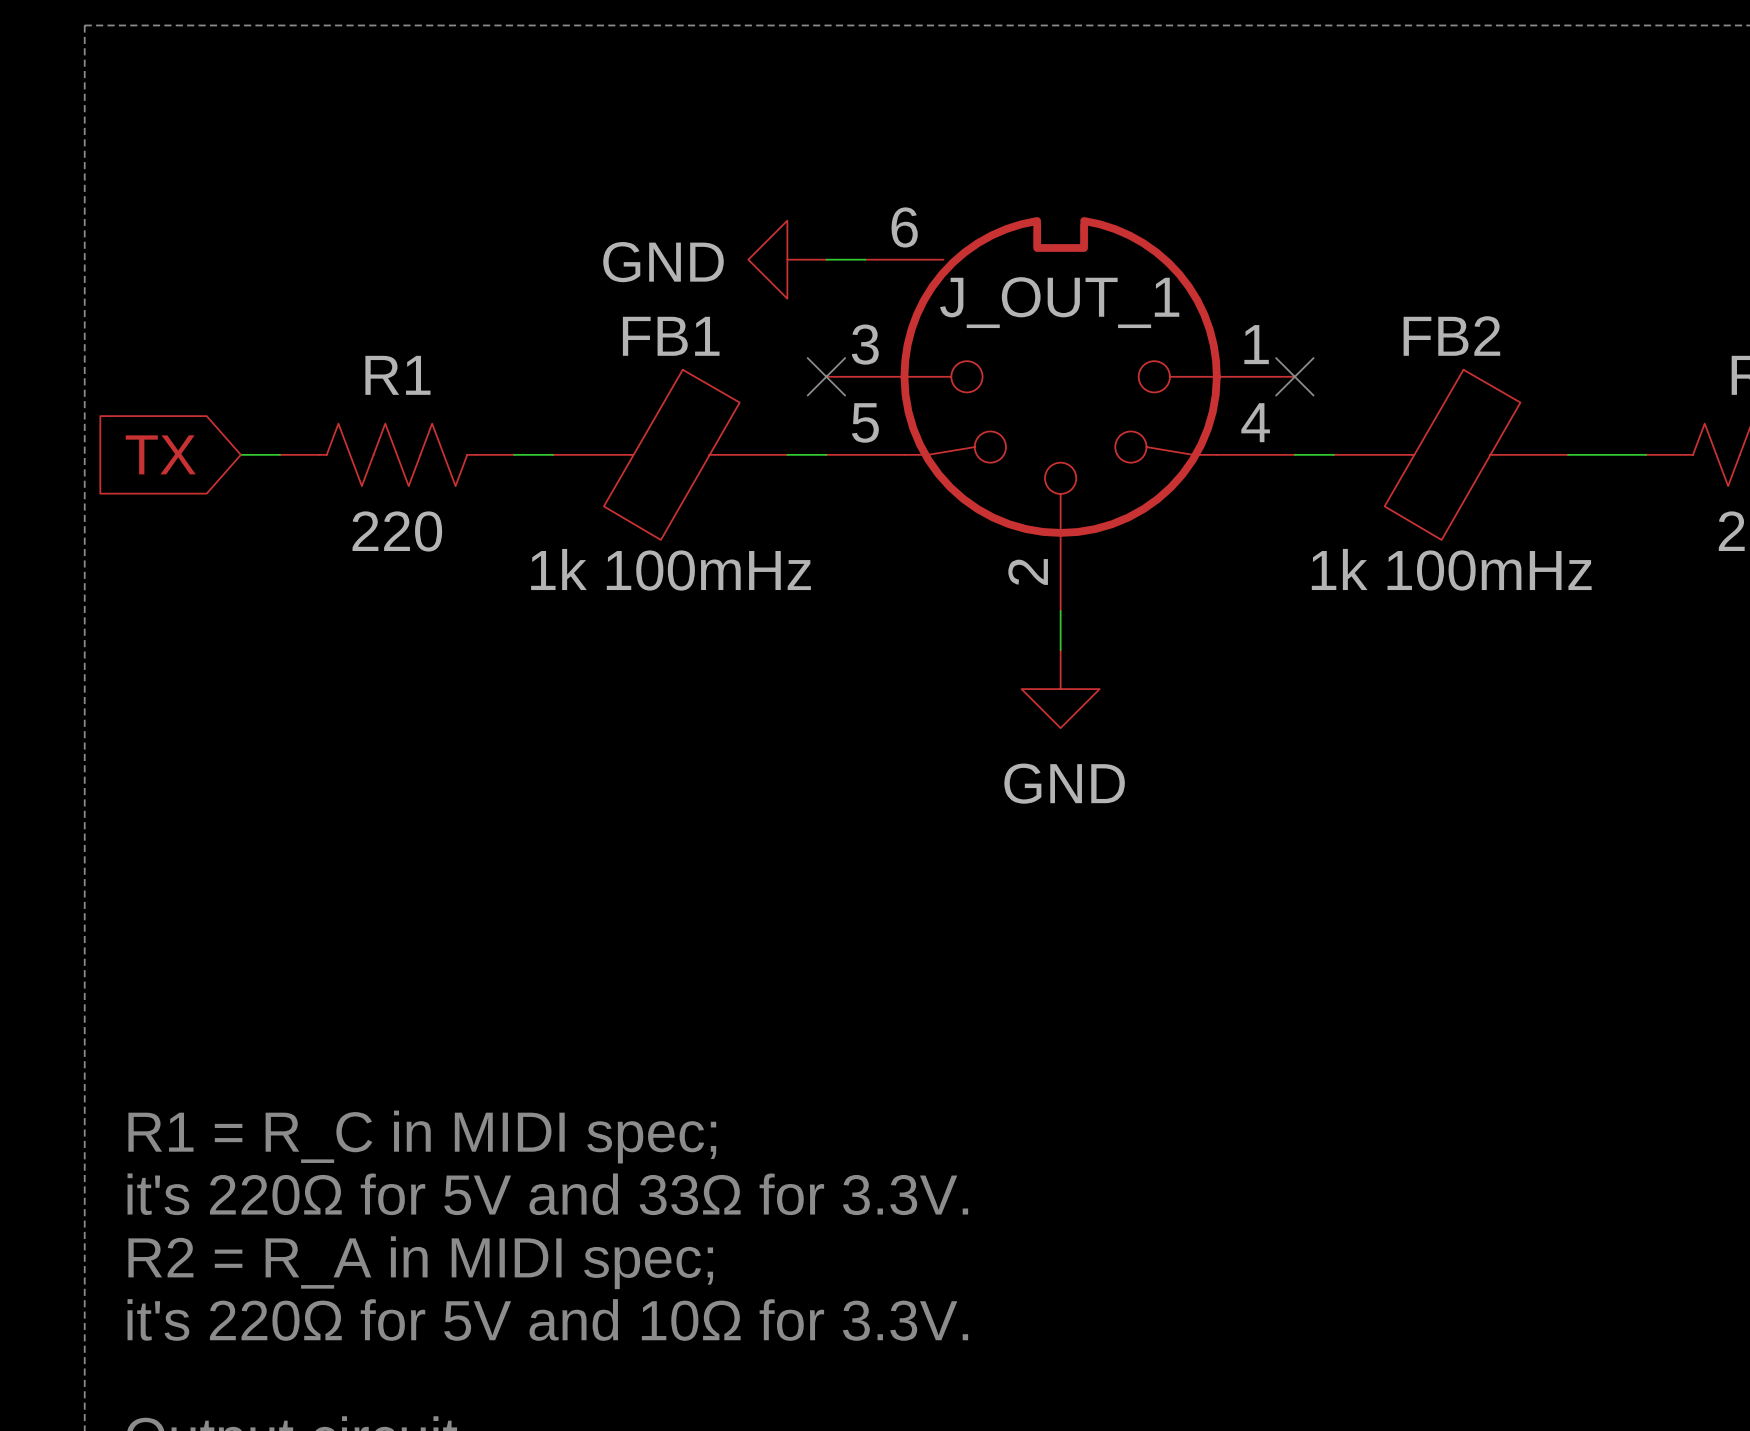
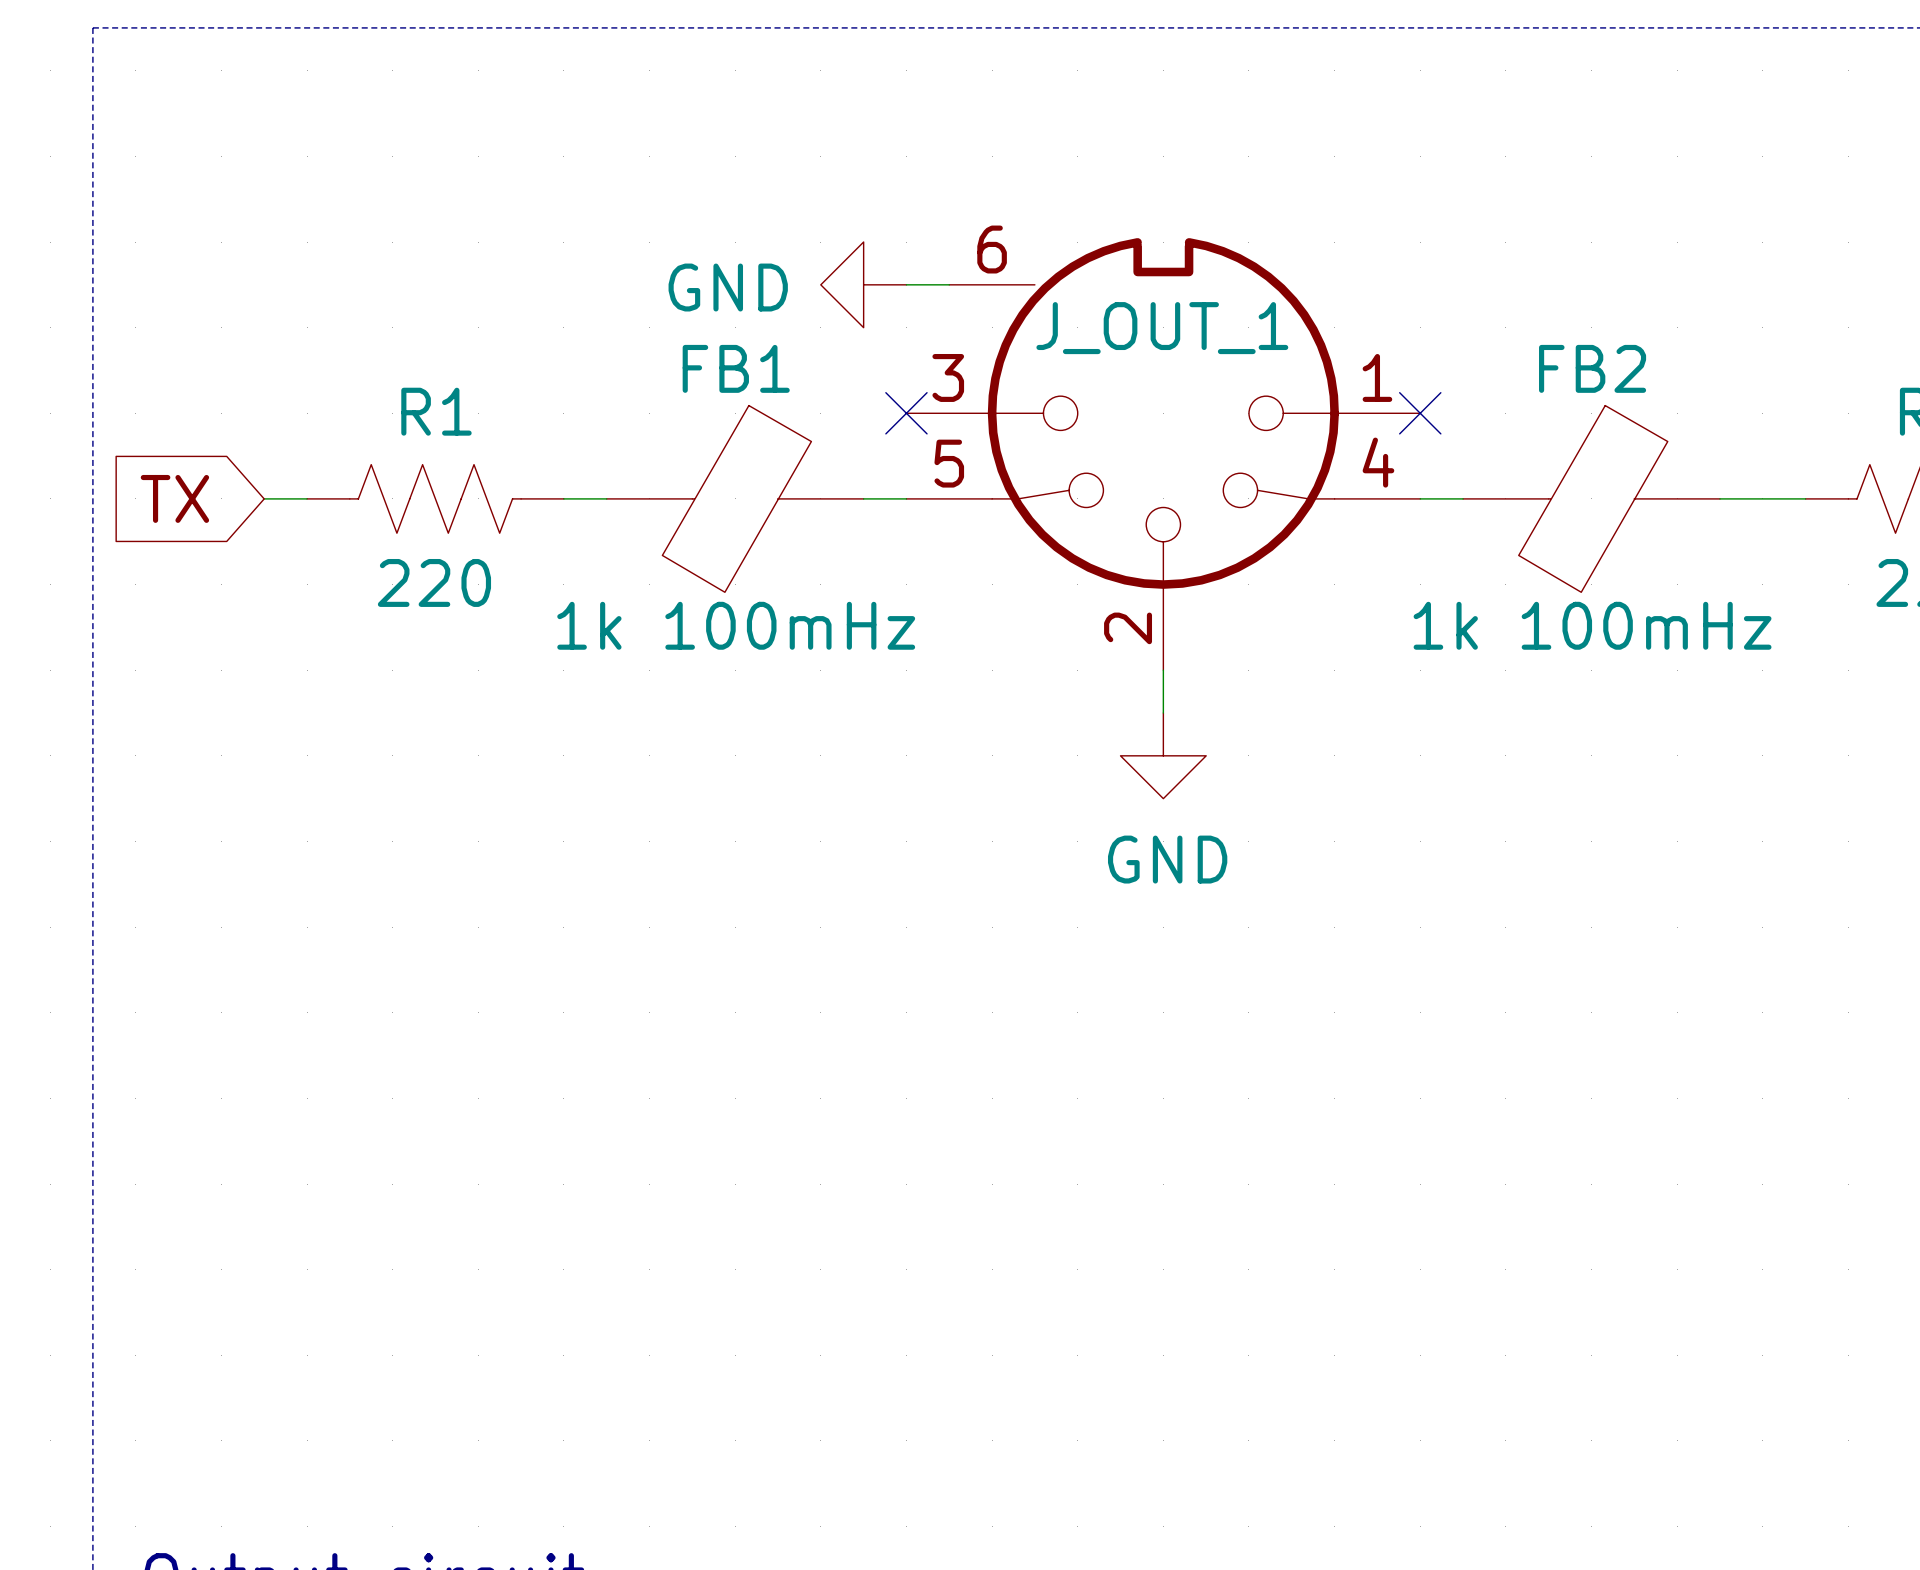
text: R1 = R_C in MIDI spec; (422, 1137) -> none
text: it's 220Ω for 5V and 33Ω for 3.3V. (547, 1194) -> none
text: R2 = R_A in MIDI spec; (420, 1262) -> none
text: it's 220Ω for 5V and 10Ω for 3.3V. (547, 1319) -> none

